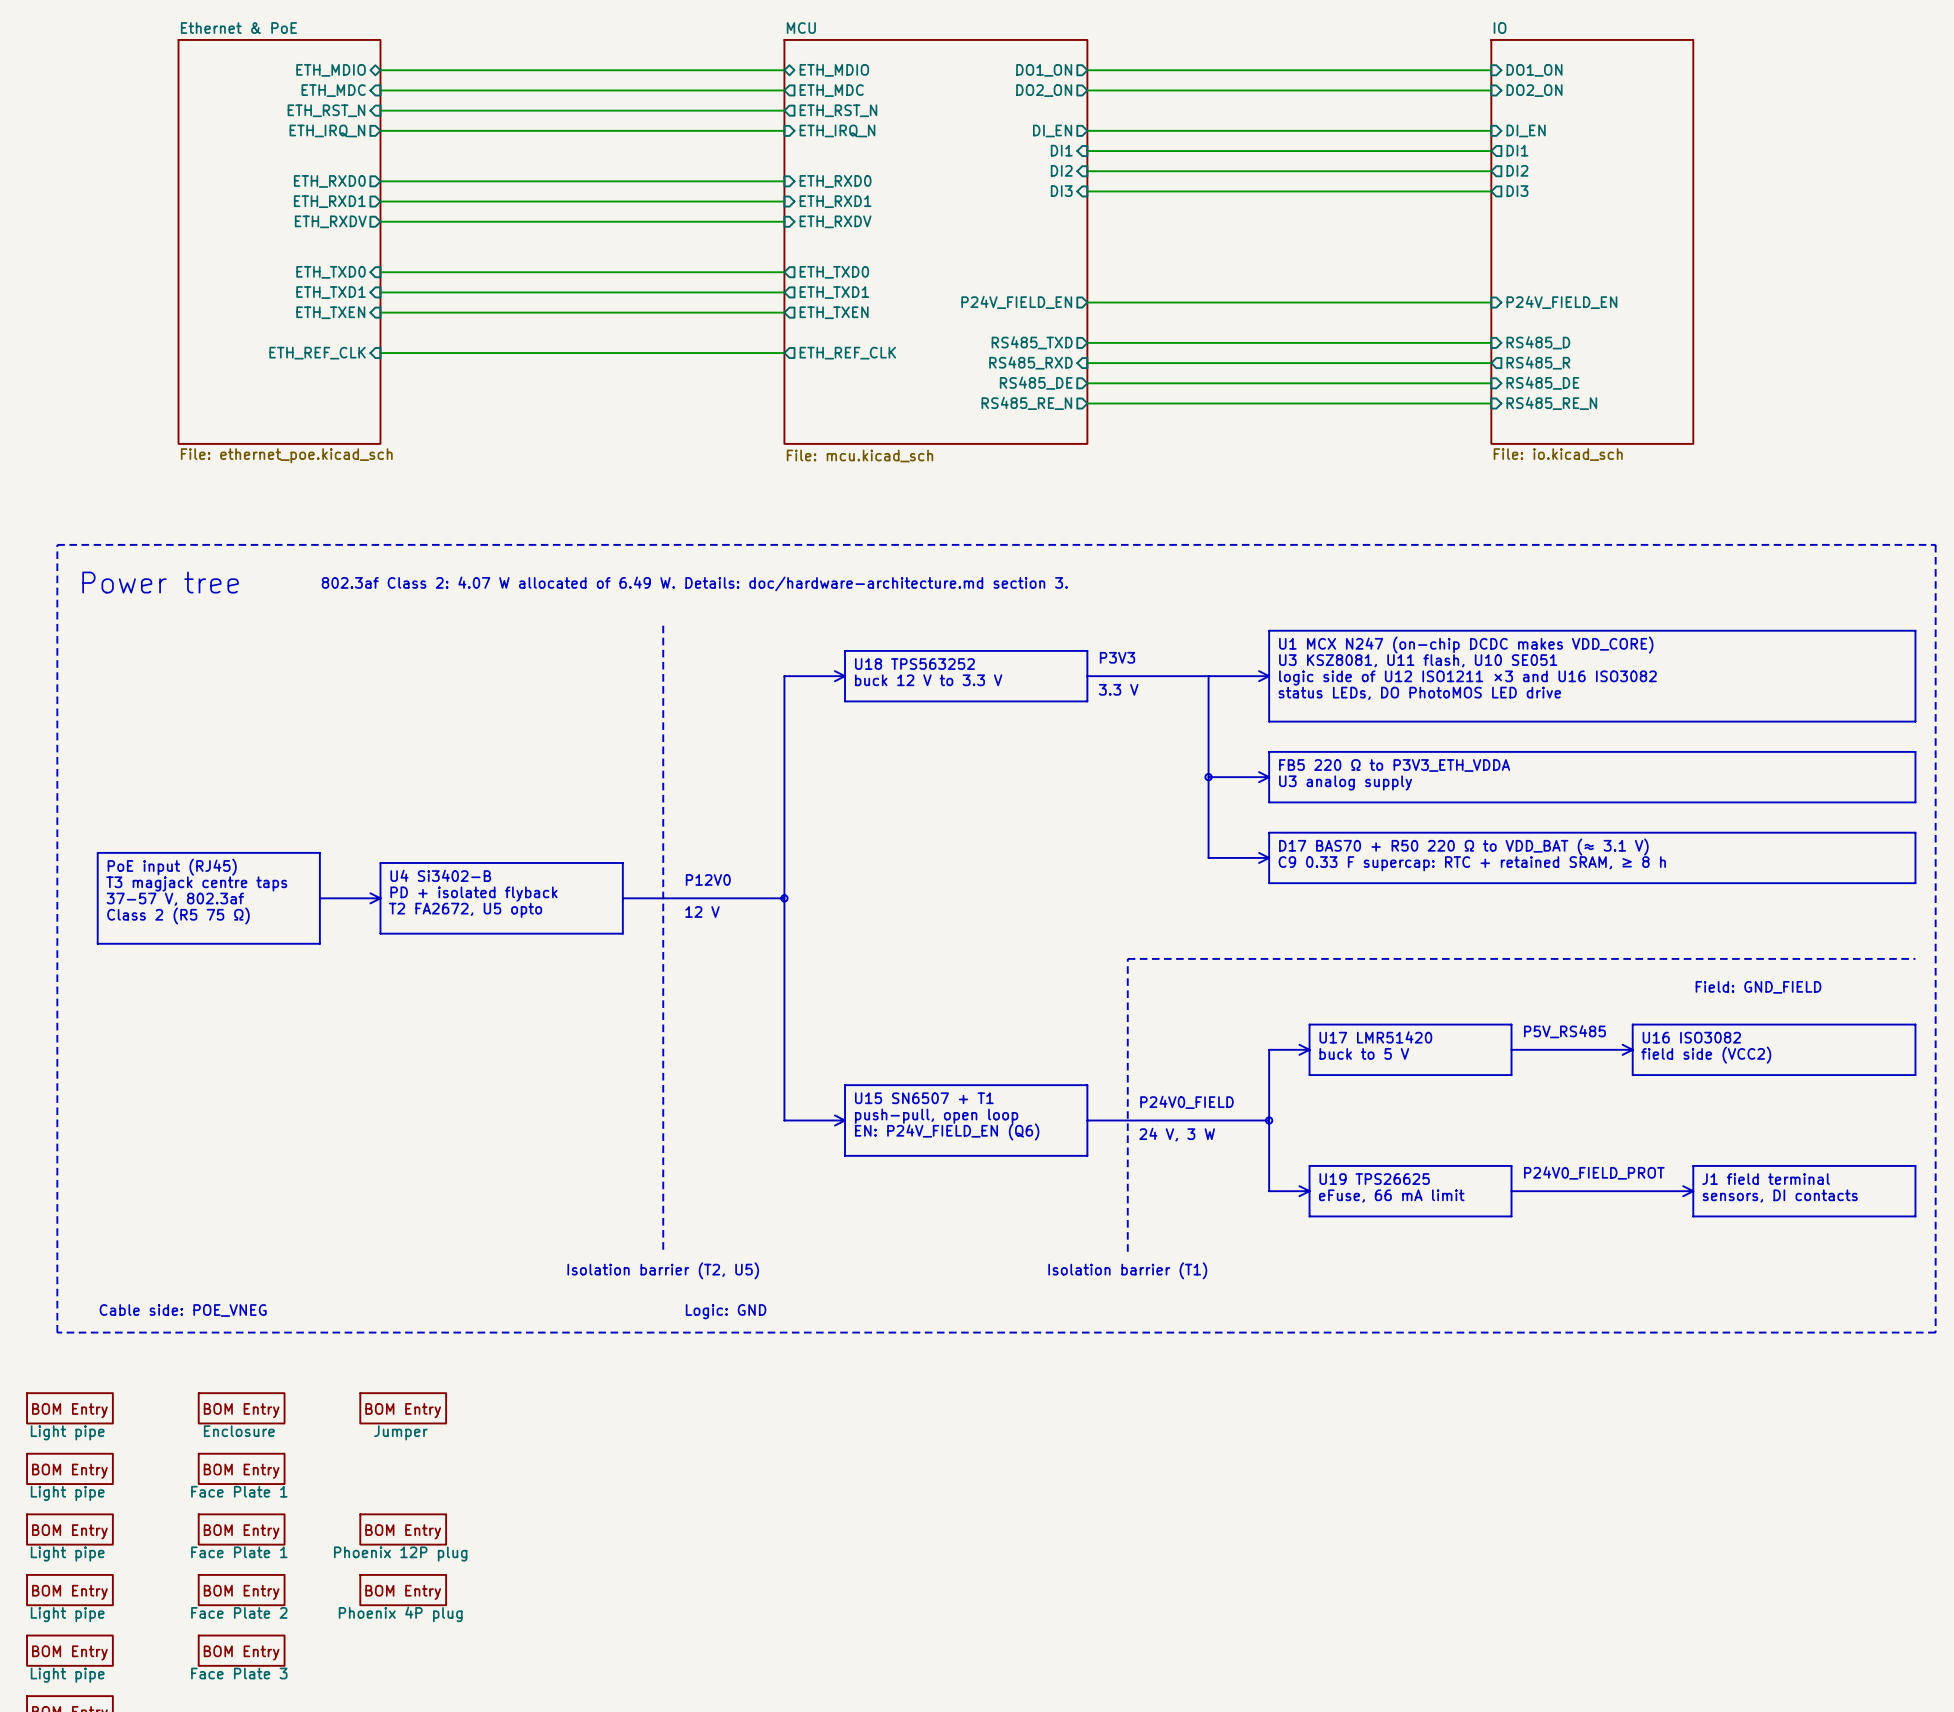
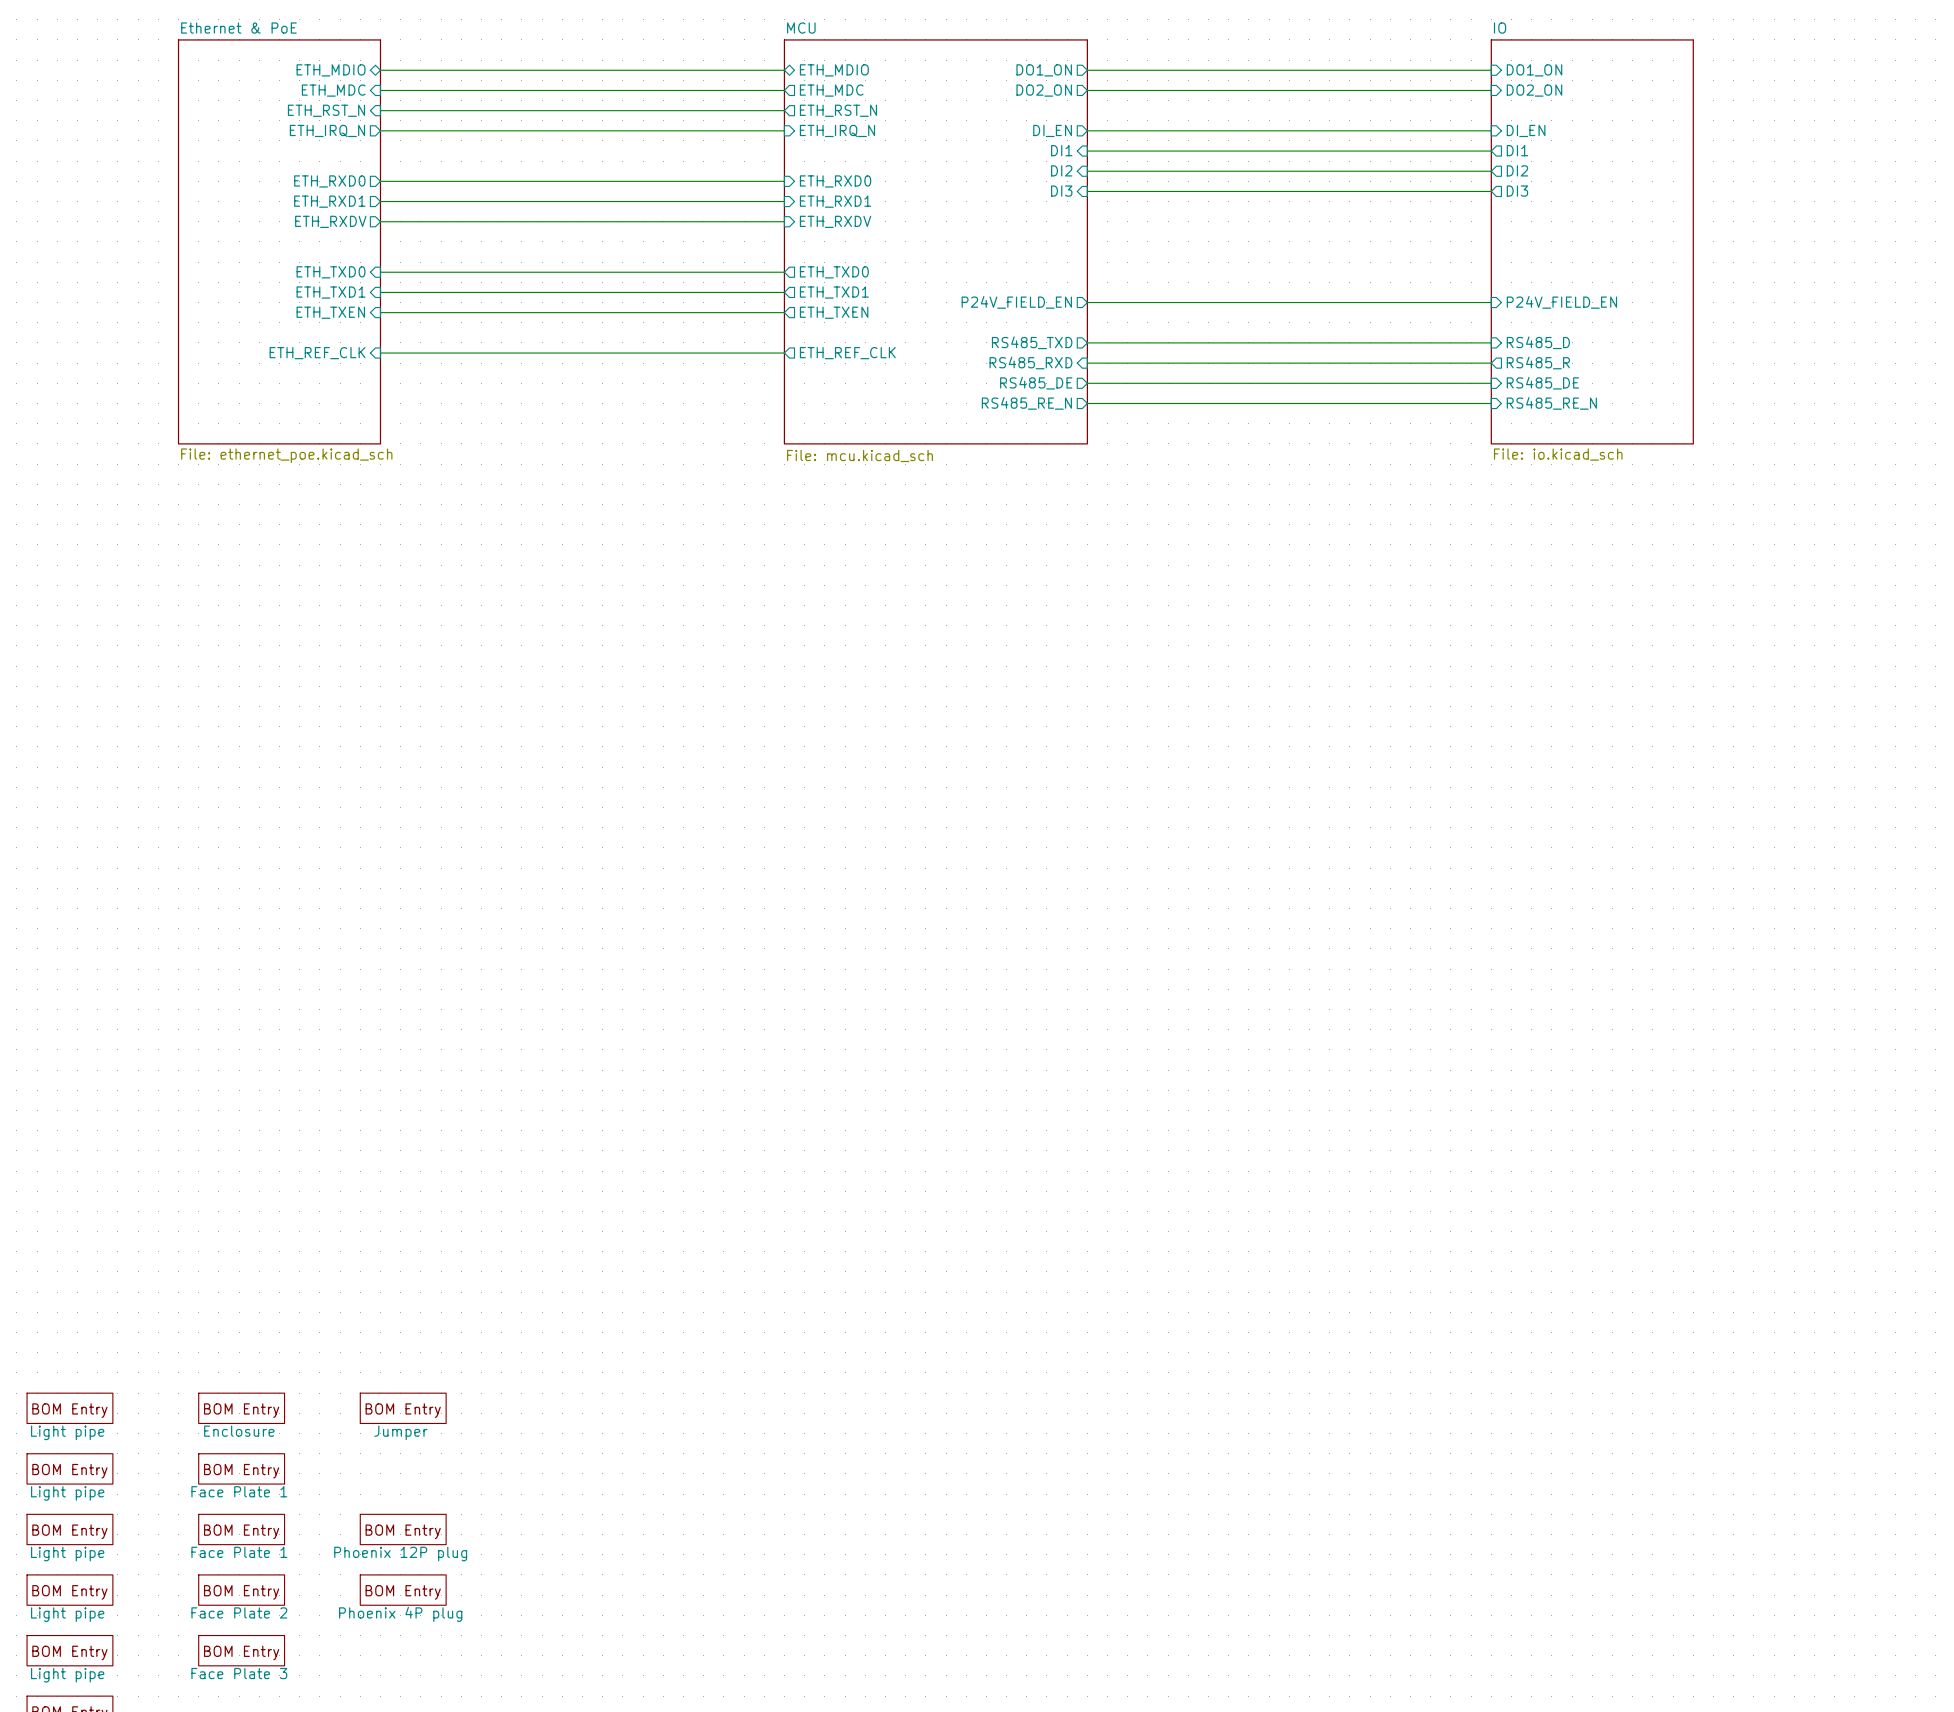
line: (57, 544) (1935, 544) (1935, 1332) (57, 1332) (57, 544) -> none
text: Power tree (160, 582) -> none
text: 802.3af Class 2: 4.07 W allocated of 6.49 W. Details: doc/hardware-architecture.md section 3. (694, 583) -> none
line: (663, 625) (663, 1251) -> none
line: (1269, 630) (1915, 630) (1915, 721) (1269, 721) (1269, 630) -> none
text: U1 MCX N247 (on-chip DCDC makes VDD_CORE) (1466, 645) -> none
line: (845, 650) (1087, 650) (1087, 701) (845, 701) (845, 650) -> none
text: P3V3 (1117, 657) -> none
text: U3 KSZ8081, U11 flash, U10 SE051 (1418, 660) -> none
text: U18 TPS563252 (914, 664) -> none
line: (834, 671) (845, 676) -> none
line: (1259, 671) (1269, 676) -> none
line: (845, 676) (834, 681) -> none
line: (845, 676) (784, 676) (784, 1120) (845, 1120) -> none
line: (1087, 676) (1269, 676) -> none
line: (1208, 676) (1208, 857) (1269, 857) -> none
line: (1269, 676) (1259, 681) -> none
text: logic side of U12 ISO1211 ×3 and U16 ISO3082 (1467, 678) -> none
text: buck 12 V to 3.3 V (928, 680) -> none
text: 3.3 V (1118, 689) -> none
text: status LEDs, DO PhotoMOS LED drive (1419, 693) -> none
line: (1269, 751) (1269, 802) (1915, 802) (1915, 751) (1269, 751) -> none
text: FB5 220 Ω to P3V3_ETH_VDDA (1394, 765) -> none
line: (1259, 772) (1269, 777) -> none
drawing: [1205, 773, 1212, 781] -> none
line: (1208, 777) (1269, 777) -> none
line: (1269, 777) (1259, 782) -> none
text: U3 analog supply (1345, 782) -> none
line: (1269, 832) (1269, 883) (1915, 883) (1915, 832) (1269, 832) -> none
text: D17 BAS70 + R50 220 Ω to VDD_BAT (≈ 3.1 V) (1463, 847) -> none
line: (97, 852) (319, 852) (319, 943) (97, 943) (97, 852) -> none
line: (1259, 852) (1269, 857) -> none
line: (1269, 857) (1259, 862) -> none
line: (380, 862) (622, 862) (622, 933) (380, 933) (380, 862) -> none
text: C9 0.33 F supercap: RTC + retained SRAM, ≥ 8 h (1472, 863) -> none
text: PoE input (RJ45) (172, 867) -> none
text: U4 Si3402-B (440, 875) -> none
text: P12V0 (708, 879) -> none
text: T3 magjack centre taps (196, 883) -> none
line: (370, 893) (380, 898) -> none
text: PD + isolated flyback (473, 894) -> none
drawing: [781, 895, 788, 902] -> none
line: (319, 898) (380, 898) -> none
line: (380, 898) (370, 903) -> none
line: (622, 898) (784, 898) -> none
text: 37-57 V, 802.3af (175, 899) -> none
text: T2 FA2672, U5 opto (465, 910) -> none
text: 12 V (702, 911) -> none
text: Class 2 (R5 75 Ω) (178, 915) -> none
line: (1915, 958) (1127, 958) (1127, 1251) -> none
text: Field: GND_FIELD (1758, 987) -> none
line: (1309, 1024) (1309, 1075) (1511, 1075) (1511, 1024) (1309, 1024) -> none
line: (1632, 1024) (1915, 1024) (1915, 1075) (1632, 1075) (1632, 1024) -> none
text: P5V_RS485 (1564, 1031) -> none
text: U17 LMR51420 (1375, 1037) -> none
text: U16 ISO3082 (1691, 1037) -> none
line: (1299, 1044) (1309, 1049) -> none
line: (1622, 1044) (1632, 1049) -> none
line: (1309, 1049) (1299, 1054) -> none
line: (1309, 1049) (1269, 1049) (1269, 1191) (1309, 1191) -> none
line: (1511, 1049) (1632, 1049) -> none
line: (1632, 1049) (1622, 1054) -> none
text: buck to 5 V (1364, 1053) -> none
text: field side (VCC2) (1706, 1055) -> none
line: (845, 1085) (845, 1155) (1087, 1155) (1087, 1085) (845, 1085) -> none
text: U15 SN6507 + T1 (924, 1098) -> none
text: P24V0_FIELD (1186, 1102) -> none
line: (834, 1115) (845, 1120) -> none
text: push-pull, open loop (936, 1116) -> none
drawing: [1265, 1117, 1273, 1124] -> none
line: (845, 1120) (834, 1125) -> none
line: (1087, 1120) (1269, 1120) -> none
text: EN: P24V_FIELD_EN (Q6) (947, 1131) -> none
text: 24 V, 3 W (1177, 1134) -> none
line: (1309, 1165) (1511, 1165) (1511, 1216) (1309, 1216) (1309, 1165) -> none
line: (1693, 1165) (1915, 1165) (1915, 1216) (1693, 1216) (1693, 1165) -> none
text: P24V0_FIELD_PROT (1594, 1173) -> none
text: U19 TPS26625 (1374, 1179) -> none
text: J1 field terminal (1766, 1179) -> none
line: (1299, 1186) (1309, 1191) -> none
line: (1683, 1186) (1693, 1191) -> none
line: (1309, 1191) (1299, 1196) -> none
line: (1511, 1191) (1693, 1191) -> none
line: (1693, 1191) (1683, 1196) -> none
text: eFuse, 66 mA limit (1391, 1196) -> none
text: sensors, DI contacts (1780, 1196) -> none
text: Isolation barrier (T2, U5) (663, 1270) -> none
text: Isolation barrier (T1) (1127, 1270) -> none
text: Cable side: POE_VNEG (183, 1310) -> none
text: Logic: GND (726, 1311) -> none

